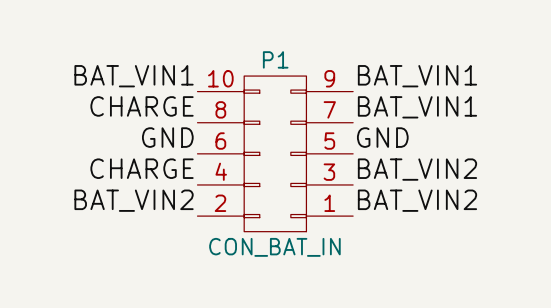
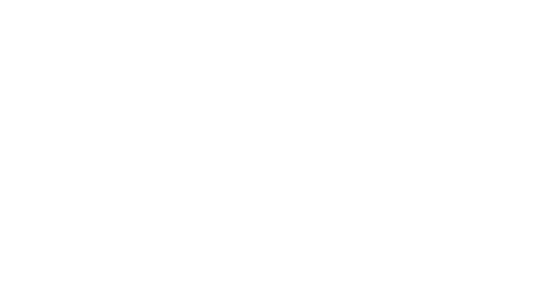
label: BAT_VIN1 (134, 76) -> none
label: BAT_VIN1 (417, 76) -> none
label: CHARGE (142, 106) -> none
label: BAT_VIN1 (417, 107) -> none
label: GND (167, 137) -> none
label: GND (382, 137) -> none
P1: CON_BAT_IN (275, 153) -> none
label: CHARGE (142, 168) -> none
label: BAT_VIN2 (417, 169) -> none
label: BAT_VIN2 (134, 200) -> none
label: BAT_VIN2 (417, 200) -> none

